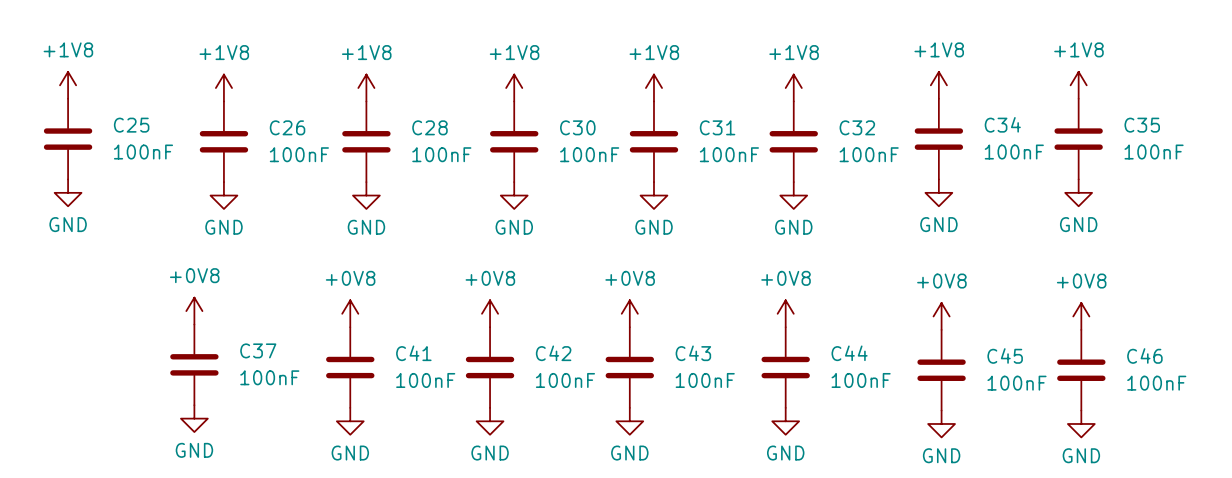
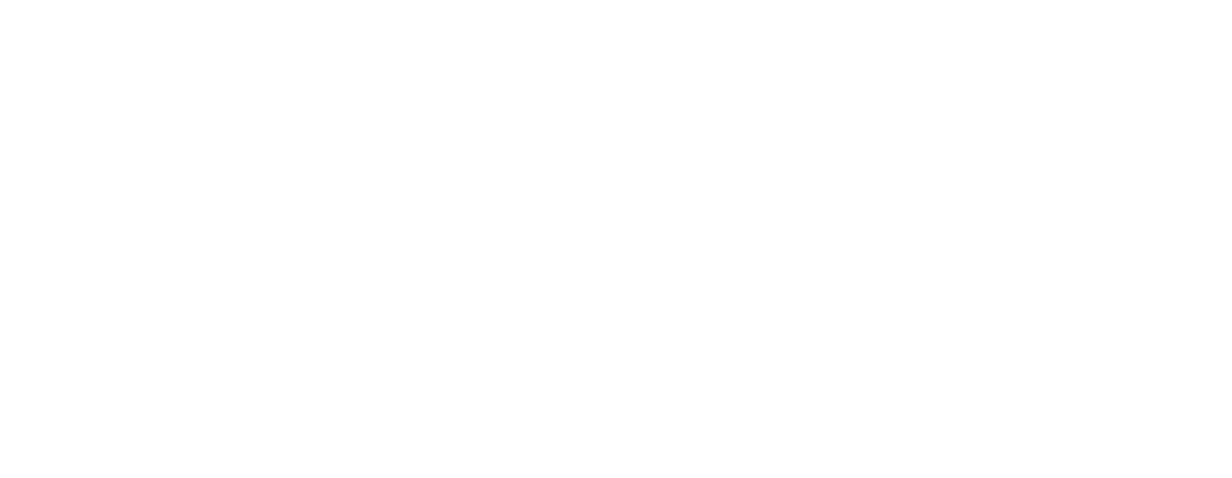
power symbol: +1V8 (68, 85) -> none
power symbol: +1V8 (938, 85) -> none
power symbol: +1V8 (1078, 85) -> none
power symbol: +1V8 (223, 88) -> none
power symbol: +1V8 (366, 88) -> none
power symbol: +1V8 (514, 88) -> none
power symbol: +1V8 (653, 88) -> none
power symbol: +1V8 (793, 88) -> none
C25: 100nF (68, 139) -> none
C34: 100nF (938, 139) -> none
C35: 100nF (1078, 139) -> none
C26: 100nF (223, 141) -> none
C28: 100nF (366, 141) -> none
C30: 100nF (514, 141) -> none
C31: 100nF (653, 141) -> none
C32: 100nF (793, 141) -> none
power symbol: GND (68, 192) -> none
power symbol: GND (938, 192) -> none
power symbol: GND (1078, 192) -> none
power symbol: GND (223, 195) -> none
power symbol: GND (366, 195) -> none
power symbol: GND (514, 195) -> none
power symbol: GND (653, 195) -> none
power symbol: GND (793, 195) -> none
power symbol: +0V8 (194, 311) -> none
power symbol: +0V8 (350, 313) -> none
power symbol: +0V8 (490, 313) -> none
power symbol: +0V8 (629, 313) -> none
power symbol: +0V8 (785, 313) -> none
power symbol: +0V8 (941, 316) -> none
power symbol: +0V8 (1081, 316) -> none
C37: 100nF (194, 364) -> none
C41: 100nF (350, 367) -> none
C42: 100nF (490, 367) -> none
C43: 100nF (629, 367) -> none
C44: 100nF (785, 367) -> none
C45: 100nF (941, 370) -> none
C46: 100nF (1081, 370) -> none
power symbol: GND (194, 418) -> none
power symbol: GND (350, 421) -> none
power symbol: GND (490, 421) -> none
power symbol: GND (629, 421) -> none
power symbol: GND (785, 421) -> none
power symbol: GND (941, 423) -> none
power symbol: GND (1081, 423) -> none

